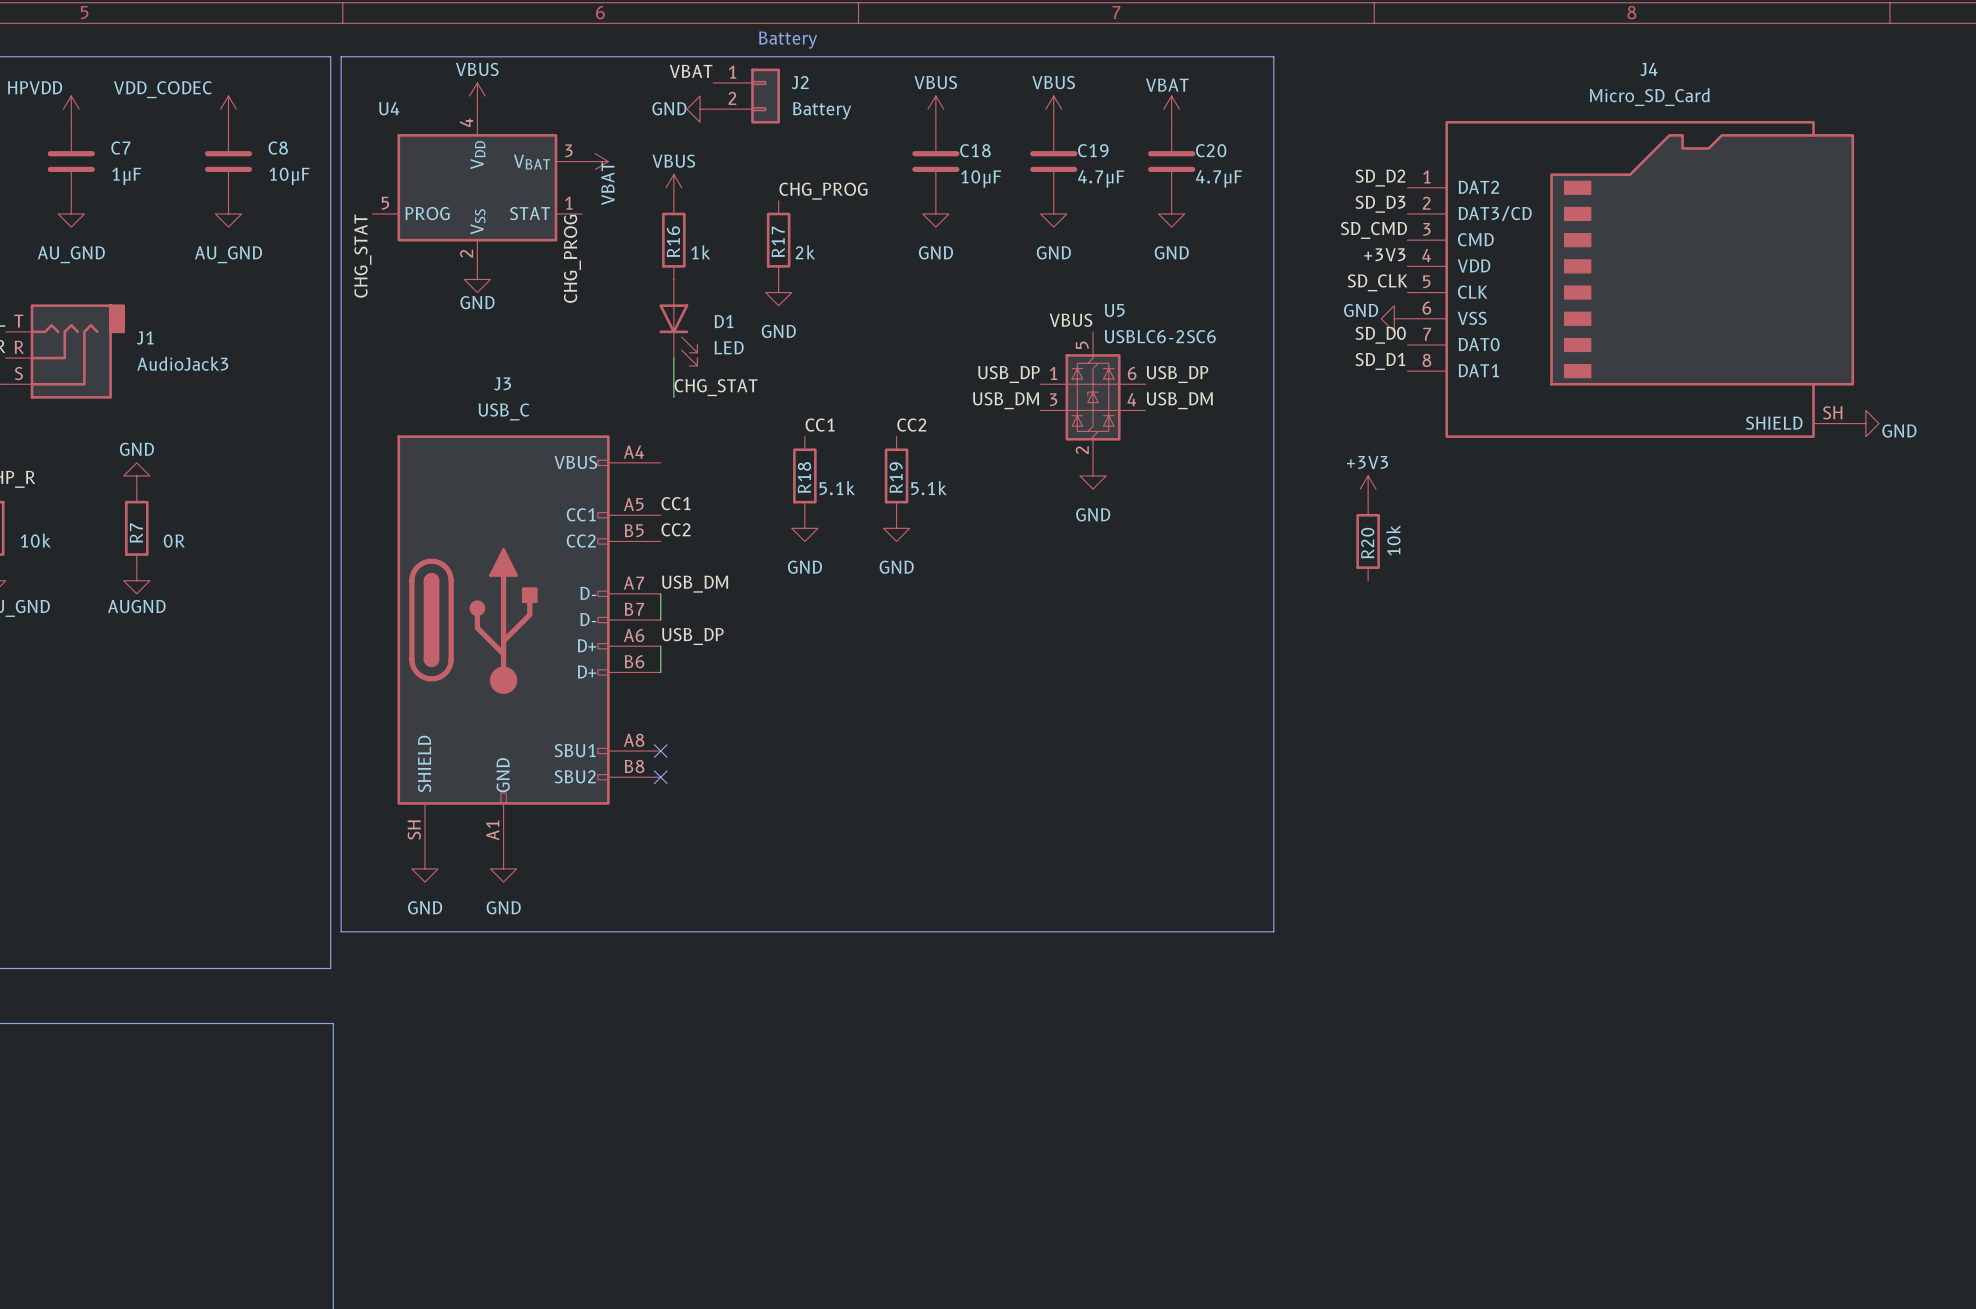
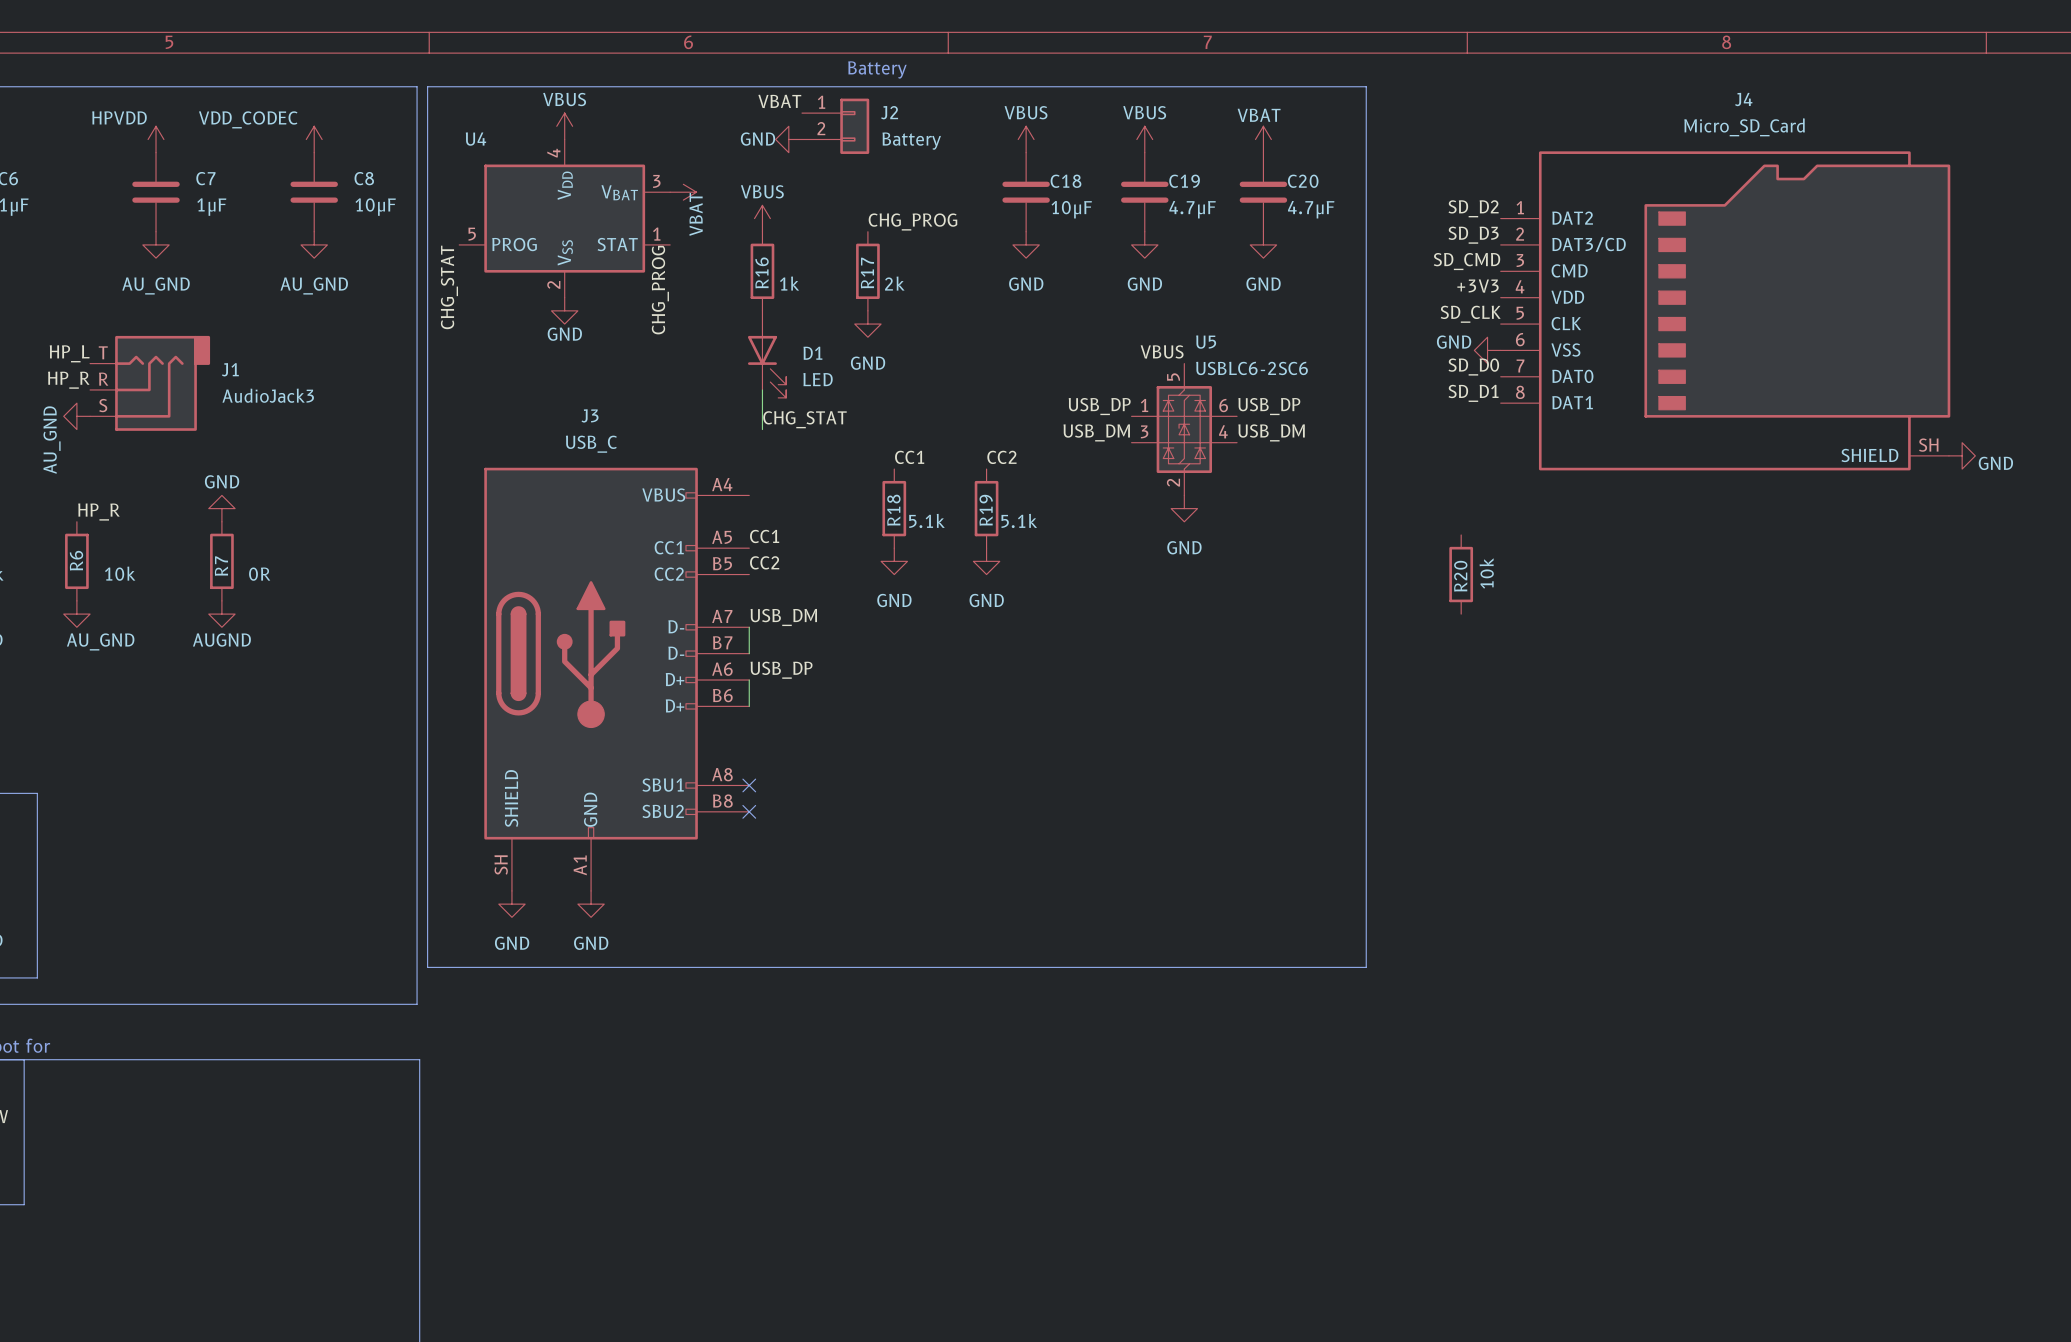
power symbol: +3V3 (1368, 489) -> none

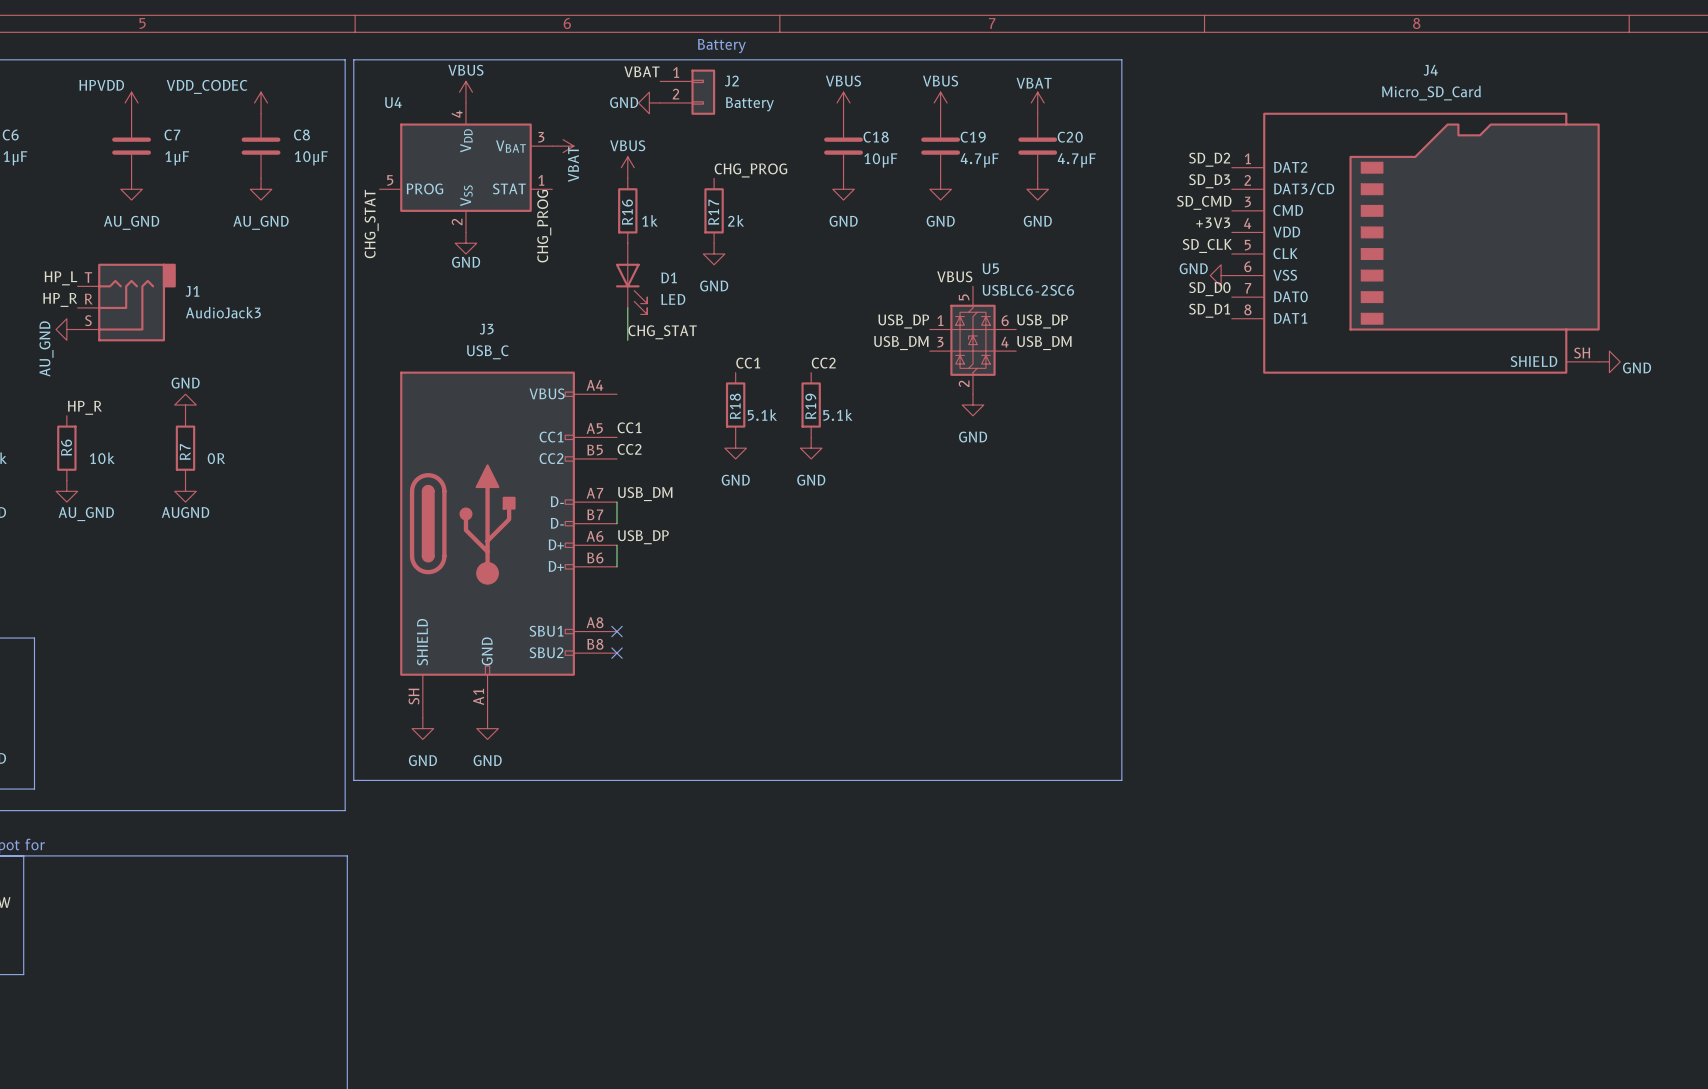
R20: 10k (1461, 574) -> none

